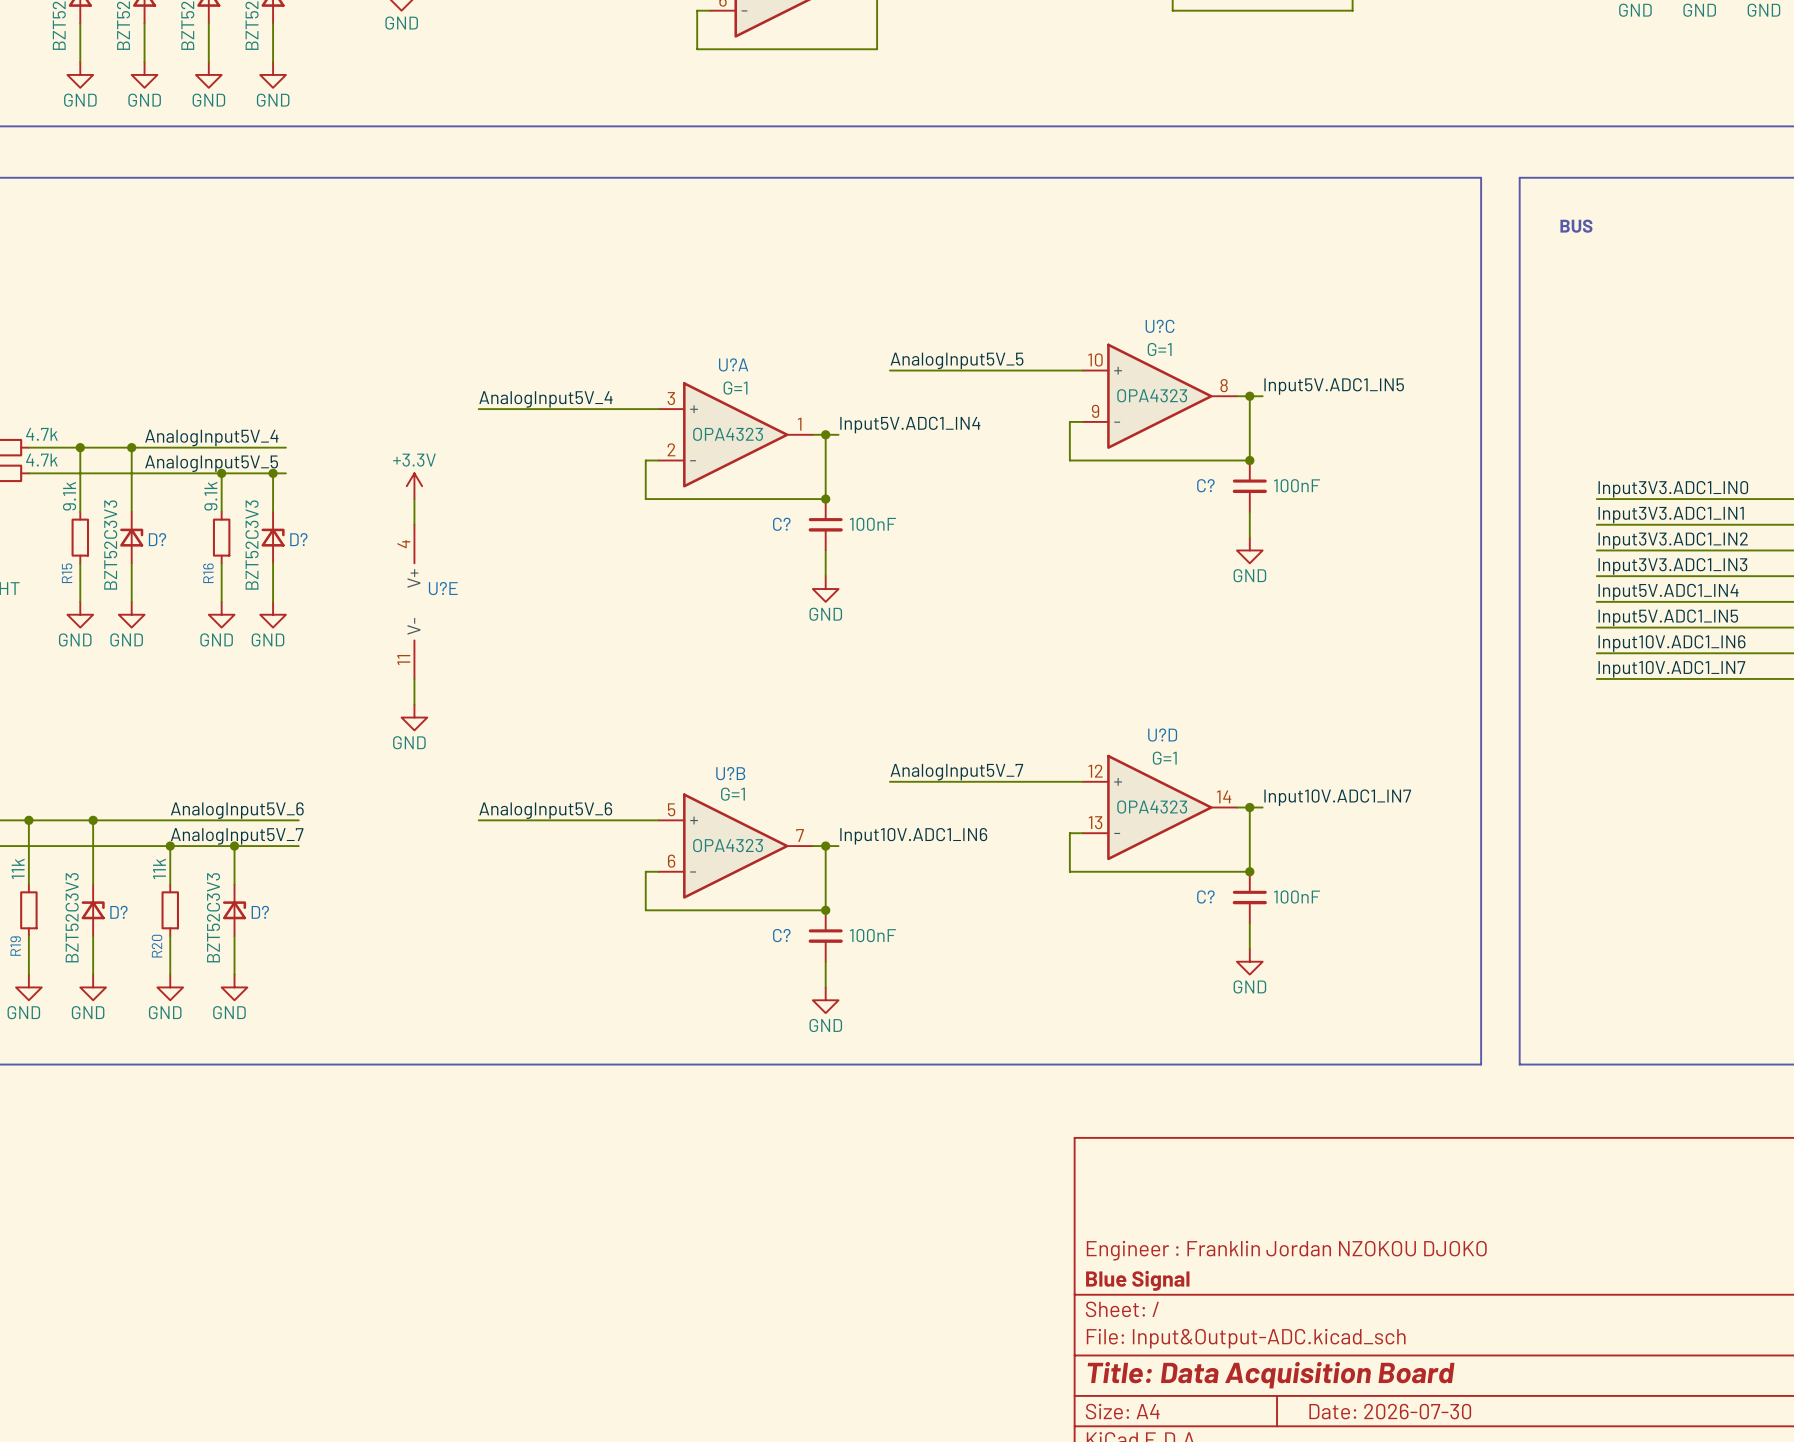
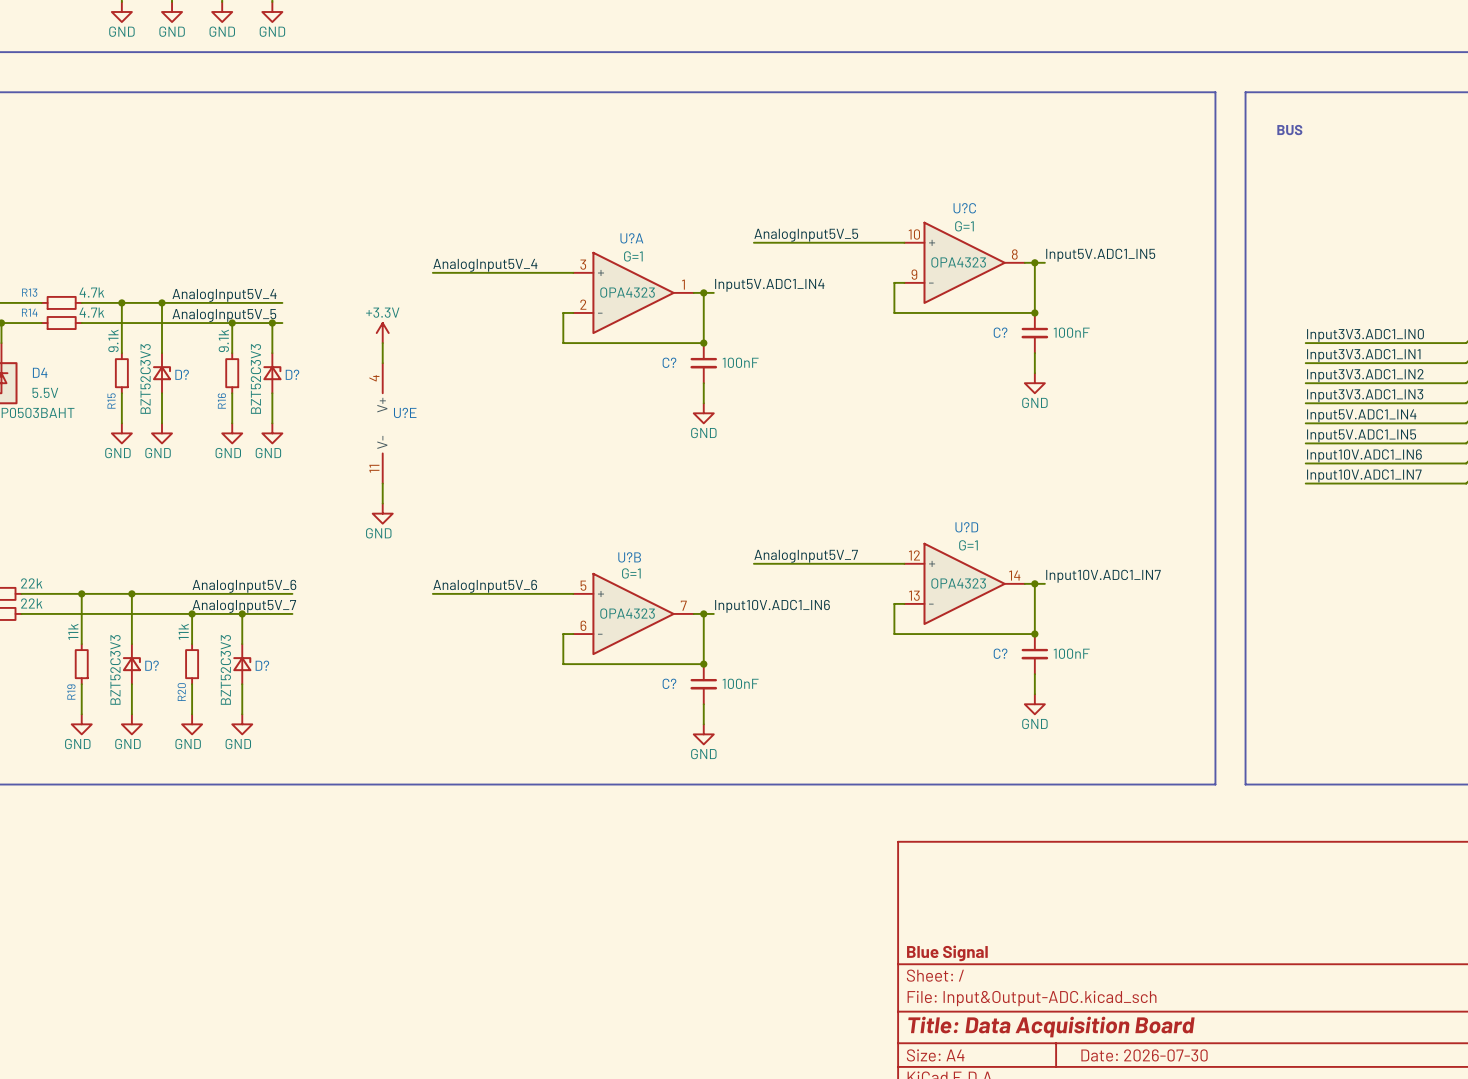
title block: Engineer : Franklin Jordan NZOKOU DJOKO (1286, 1250) -> none

